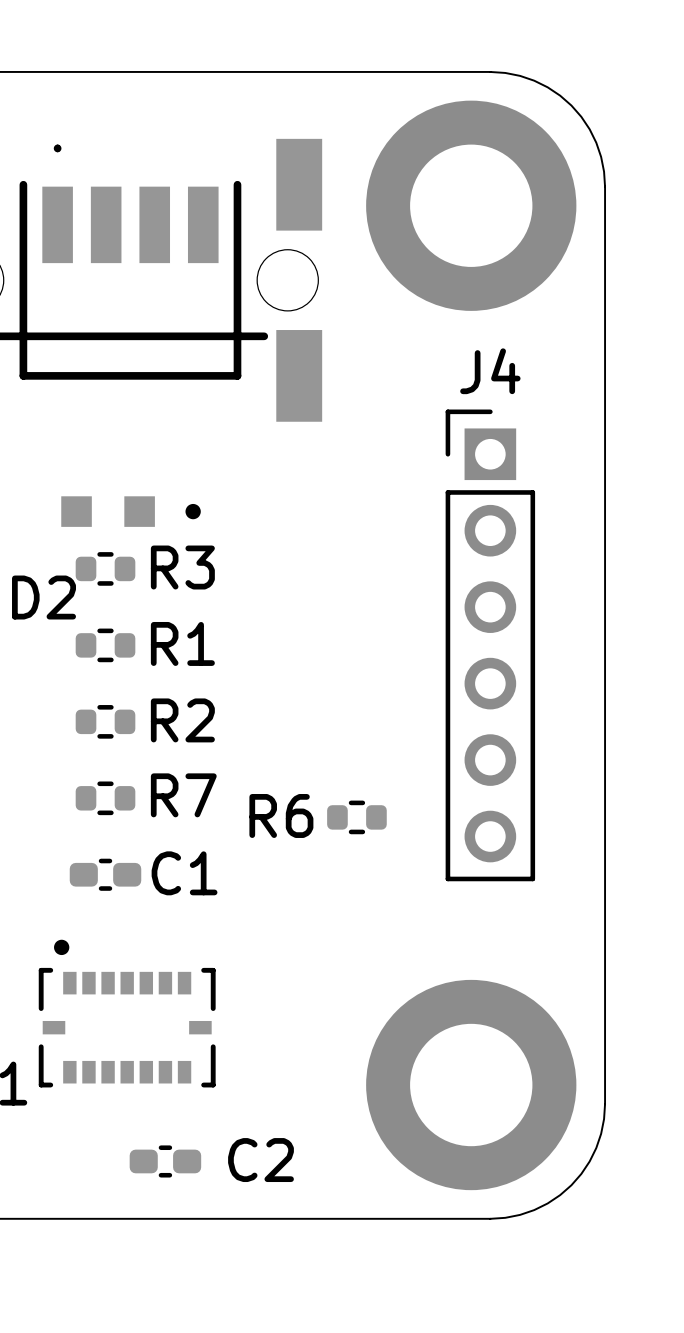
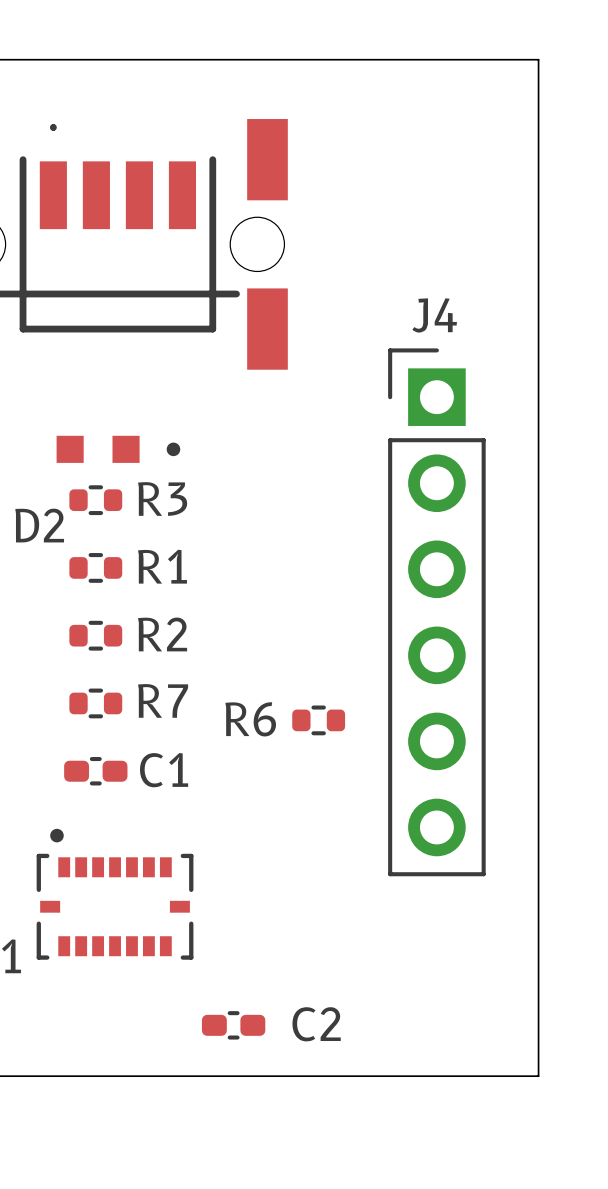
board edge: (490, 71) (505, 72) (534, 80) (560, 95) (571, 105) (581, 116) (596, 142) (601, 156) (605, 186) -> (436, 59) (538, 59) (538, 161)
part: (471, 205) -> none
J4 footprint: [445, 409, 536, 882] -> [388, 348, 486, 877]
part: (471, 1085) -> none
board edge: (605, 1104) (601, 1133) (596, 1148) (589, 1161) (571, 1185) (547, 1203) (534, 1210) (520, 1214) (490, 1218) -> (538, 974) (538, 1076) (436, 1076)
C2 position: (165, 1161) -> (233, 1025)

